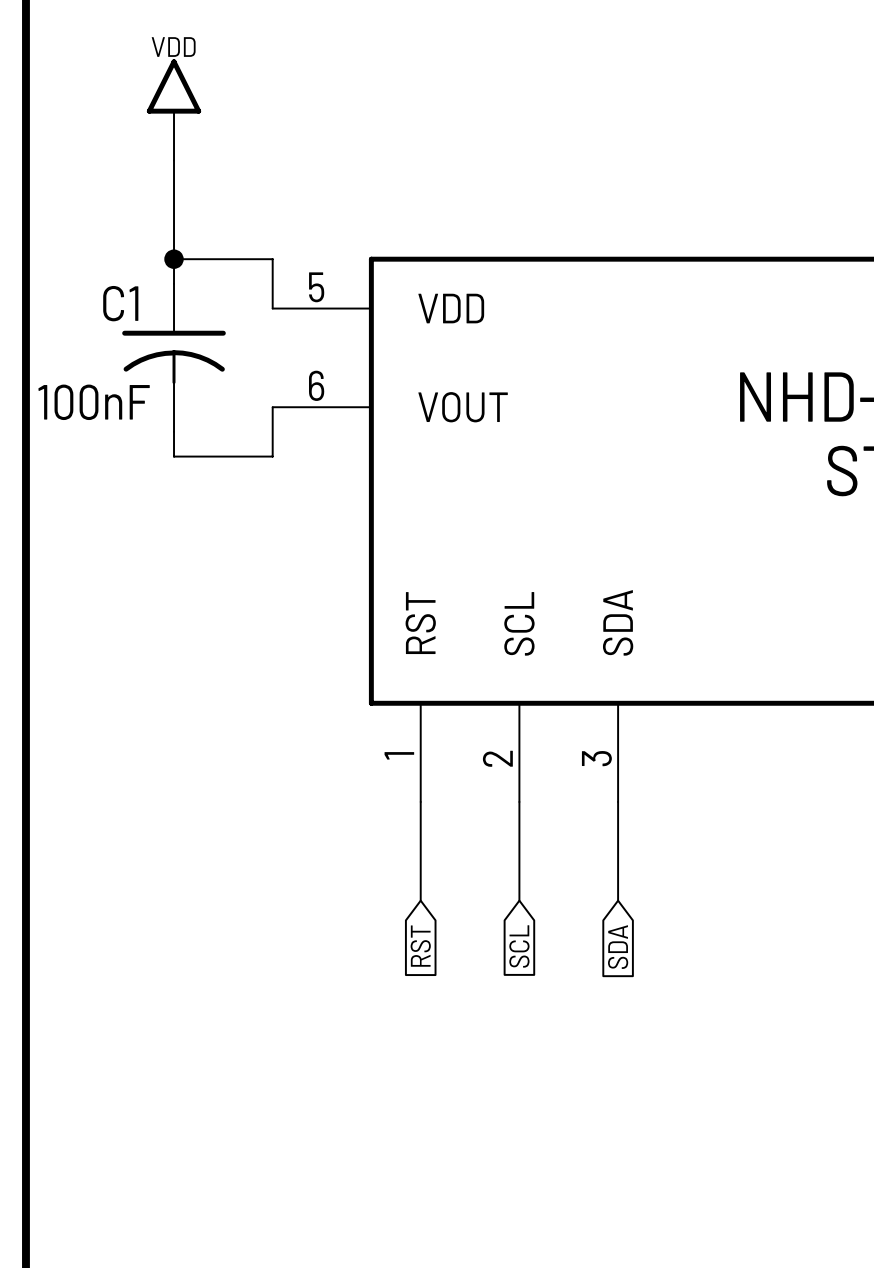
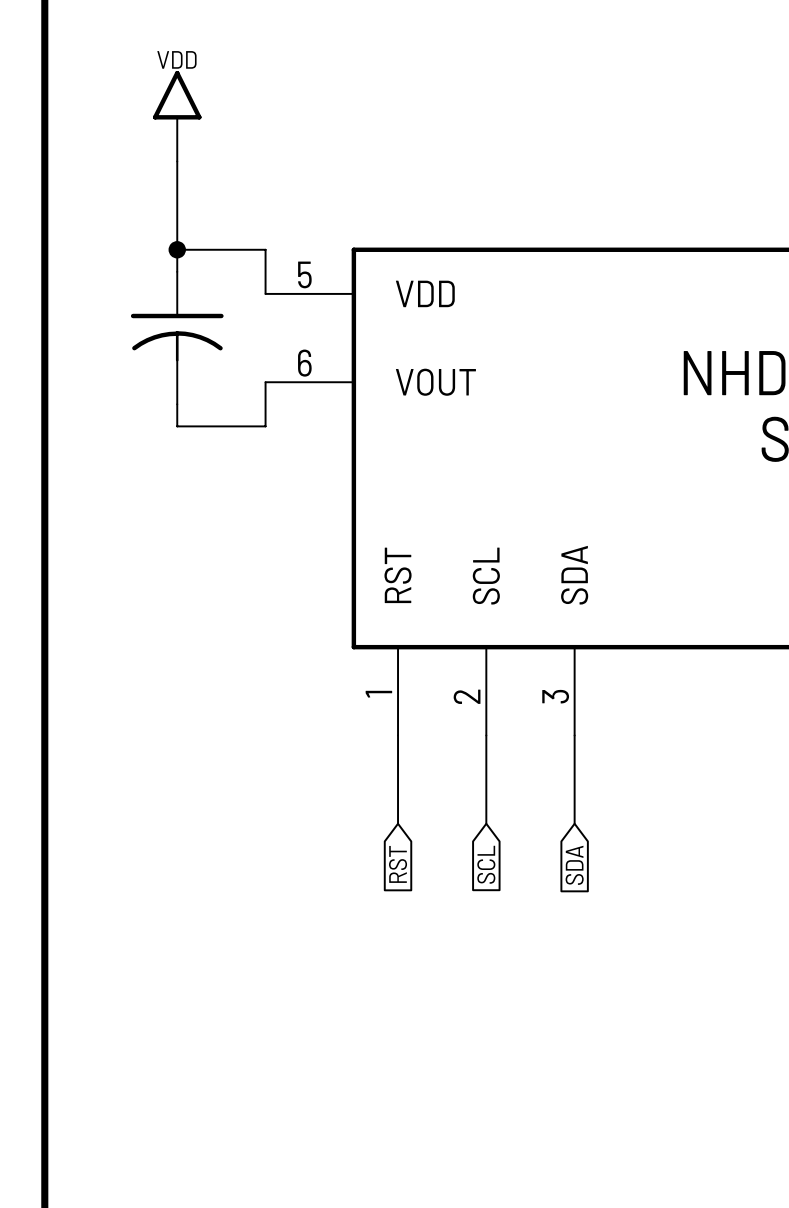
C1 name: C1 (120, 303) -> none
C1 value: 100nF (94, 402) -> none

